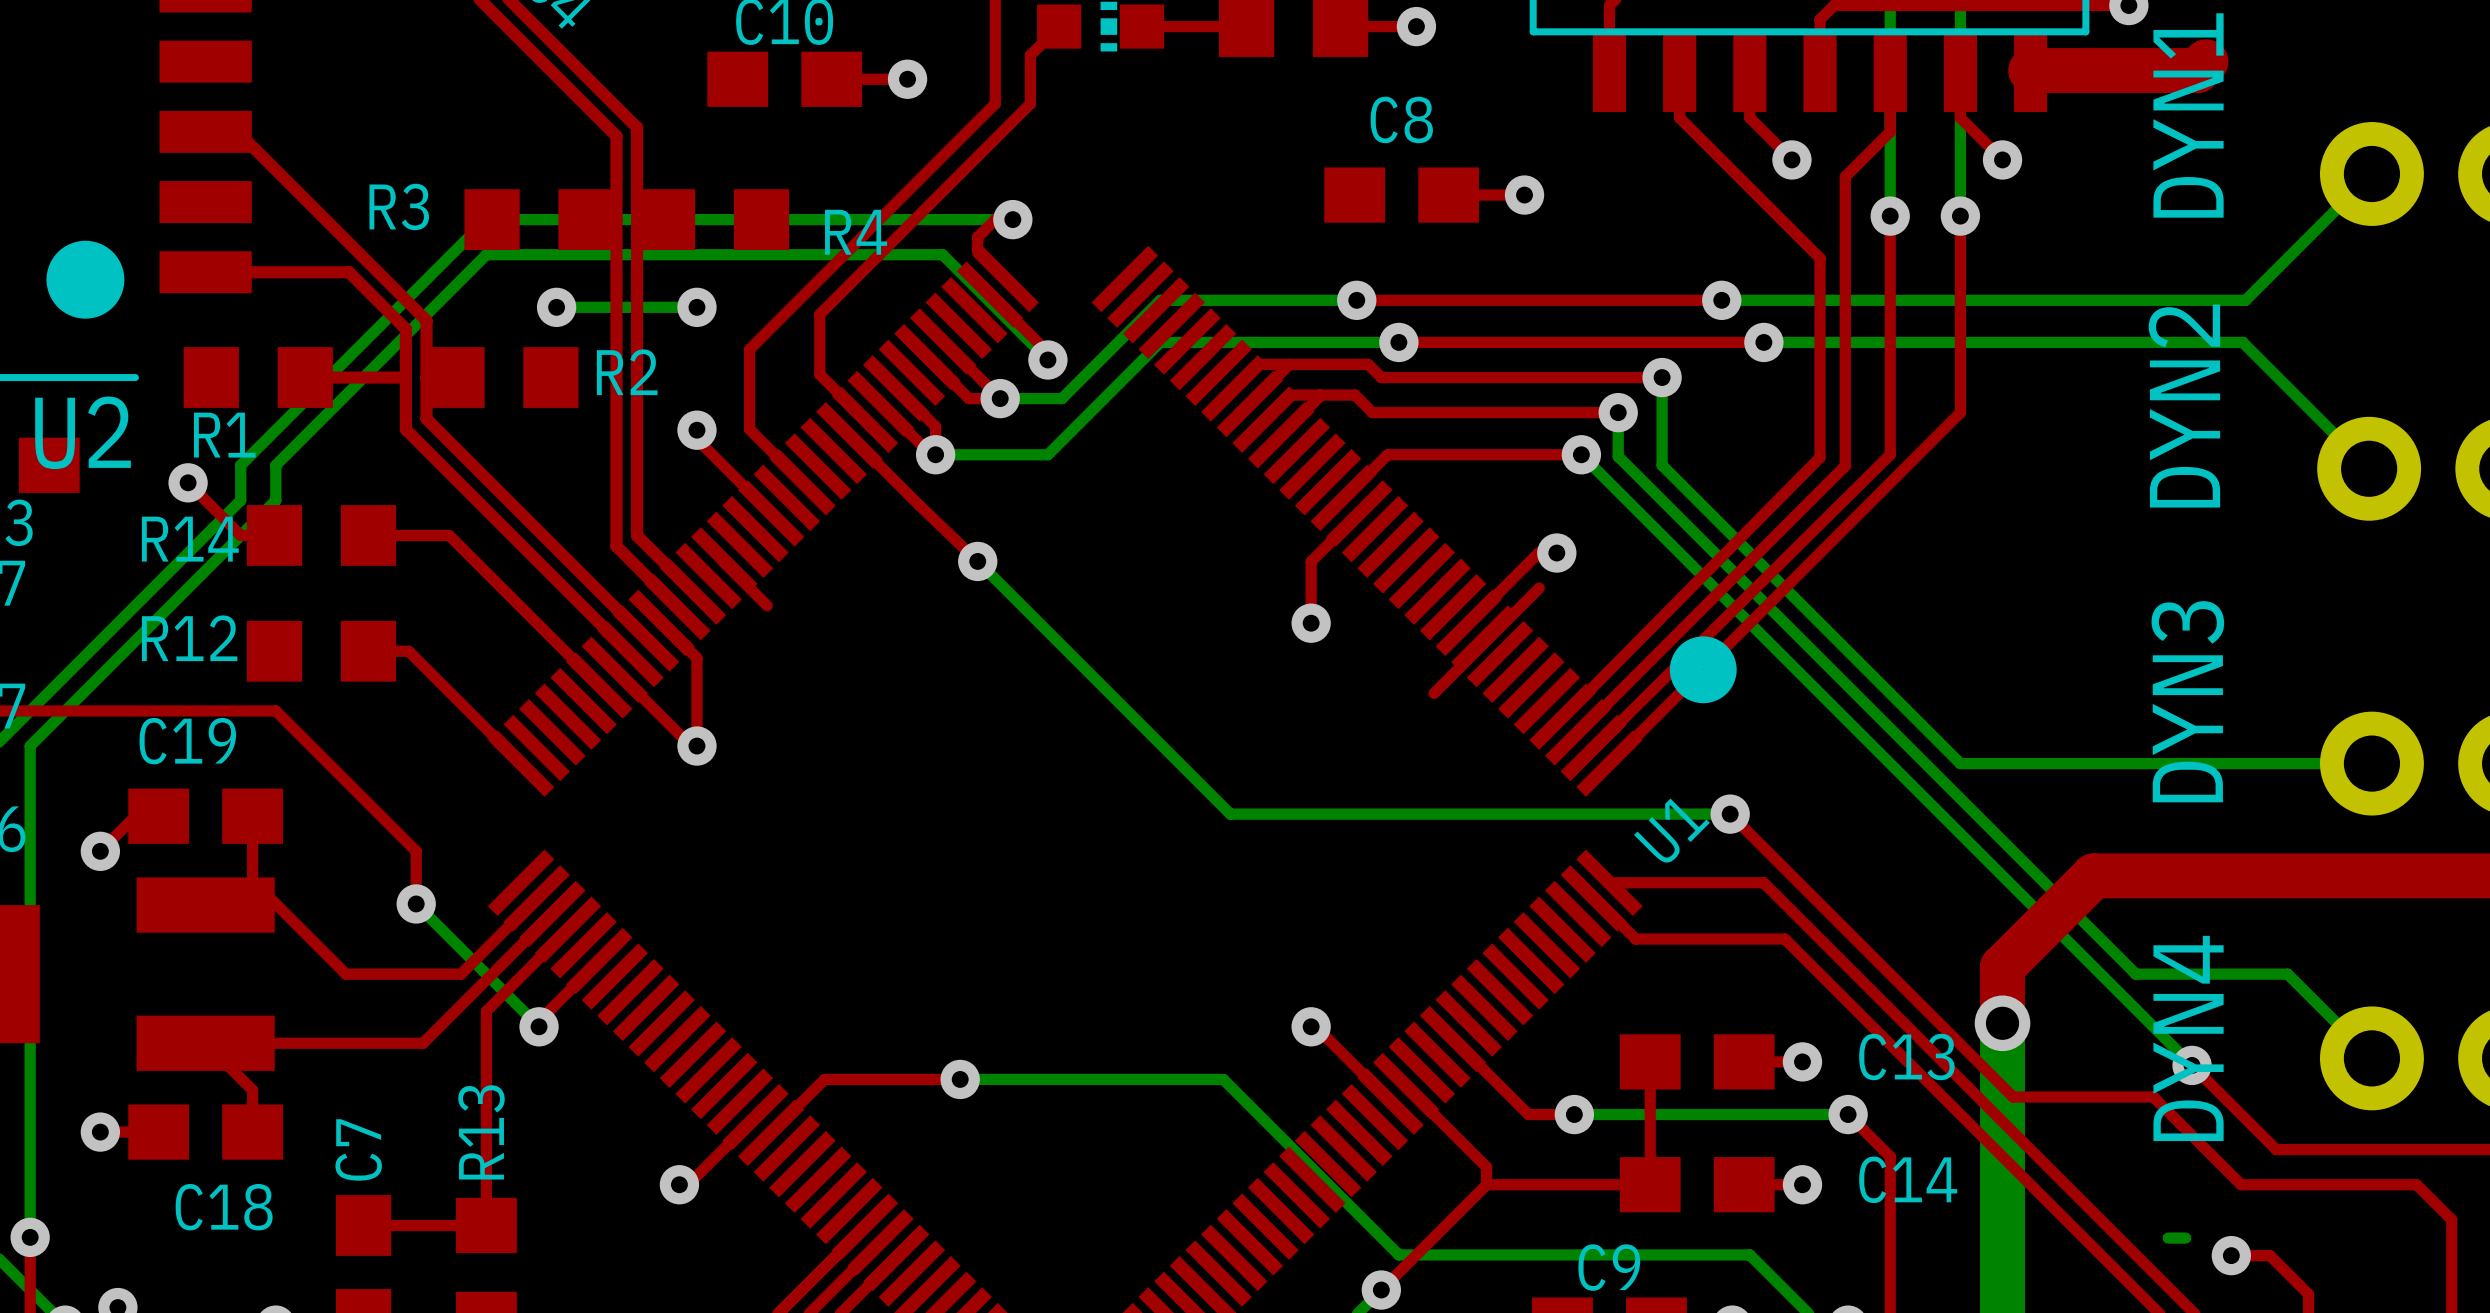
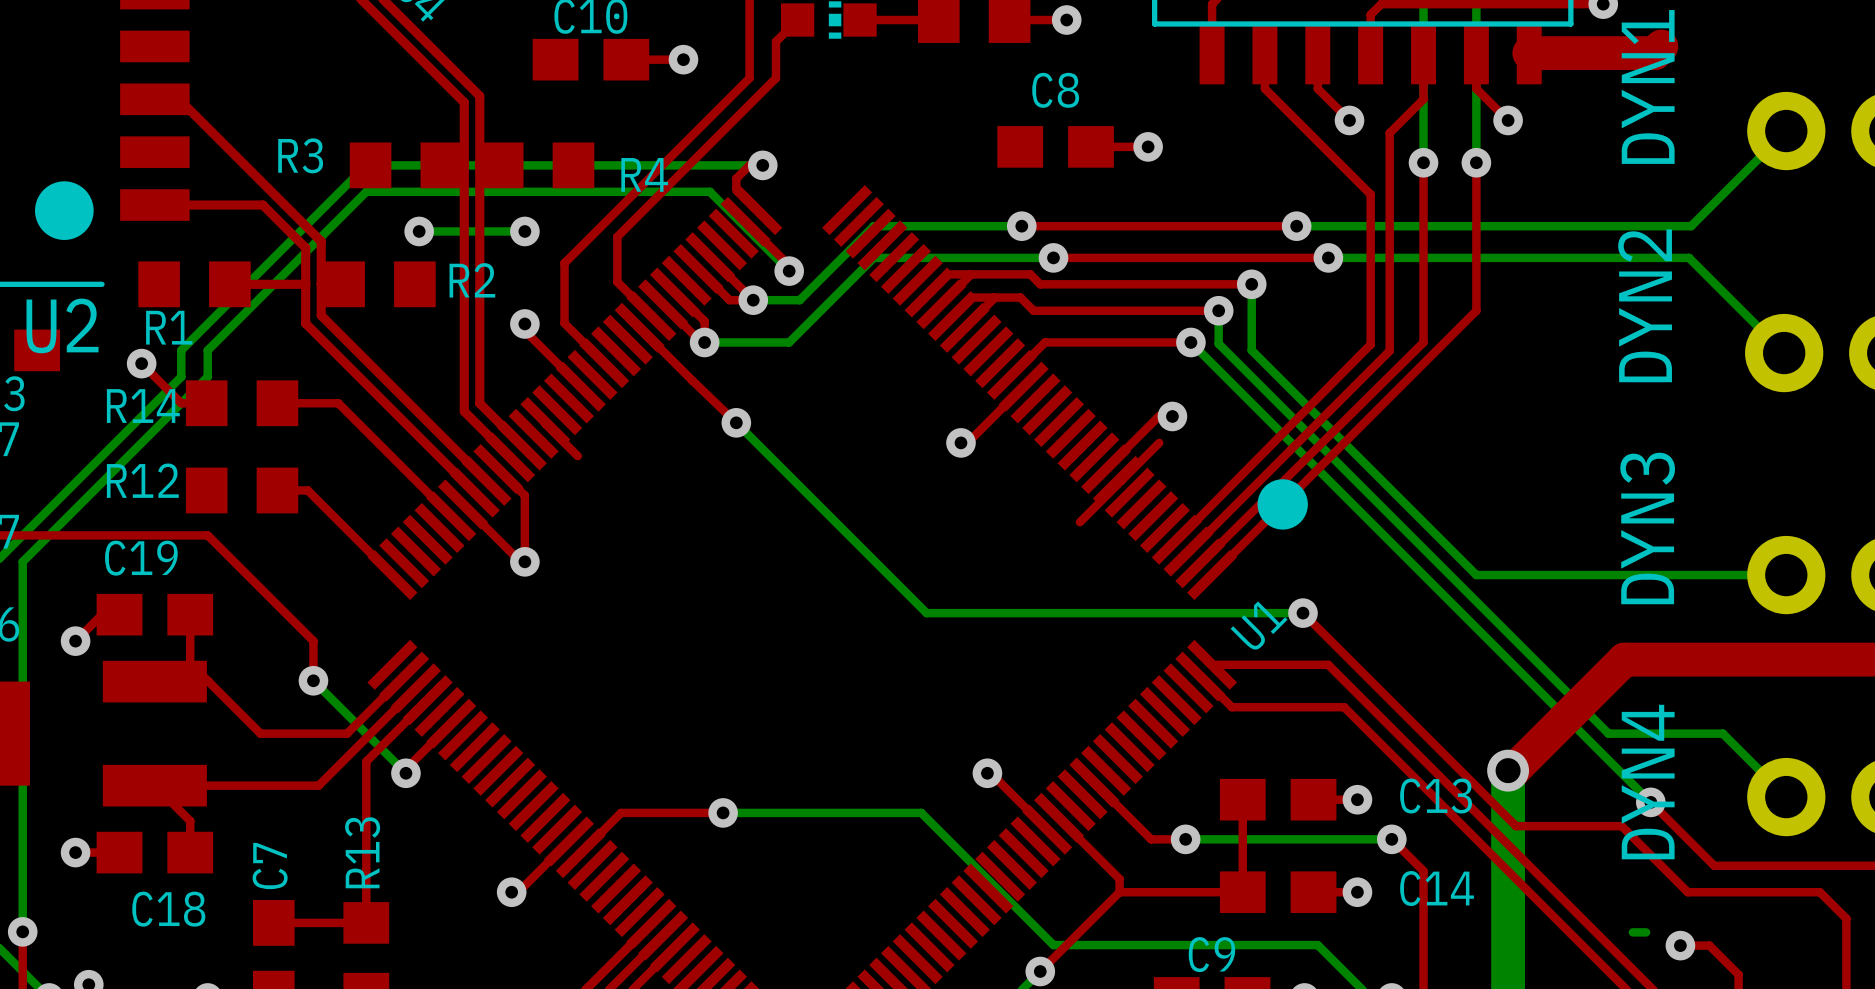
top track: (1311, 561) (1311, 623) -> (987, 422) (967, 442) (960, 442)
via position: (1311, 623) -> (960, 442)
top track: (2156, 875) (2093, 875) (2002, 967) (2002, 1023) -> (1624, 659) (1513, 770) (1508, 770)

